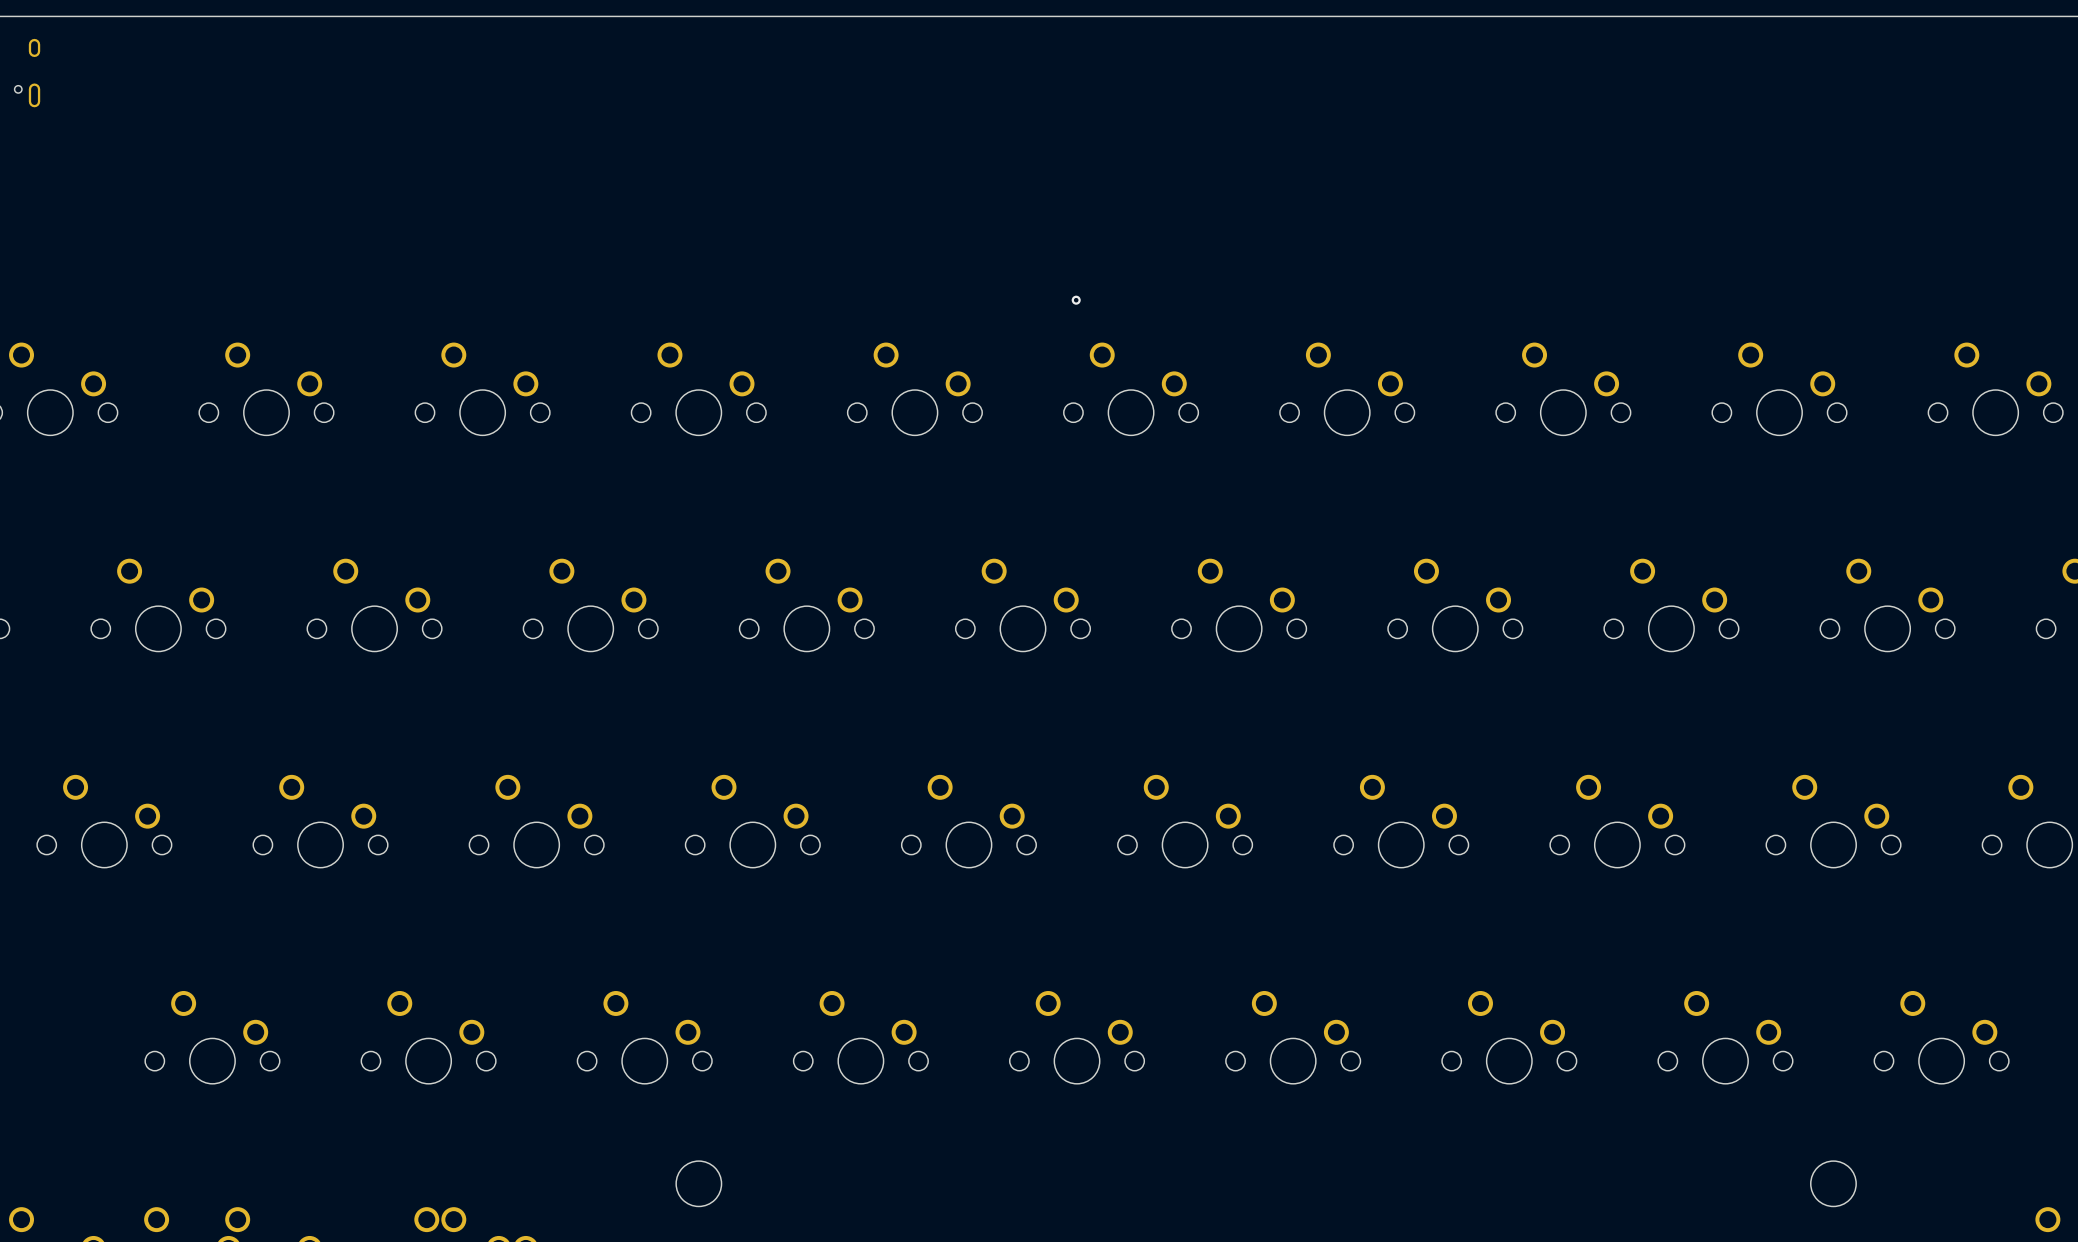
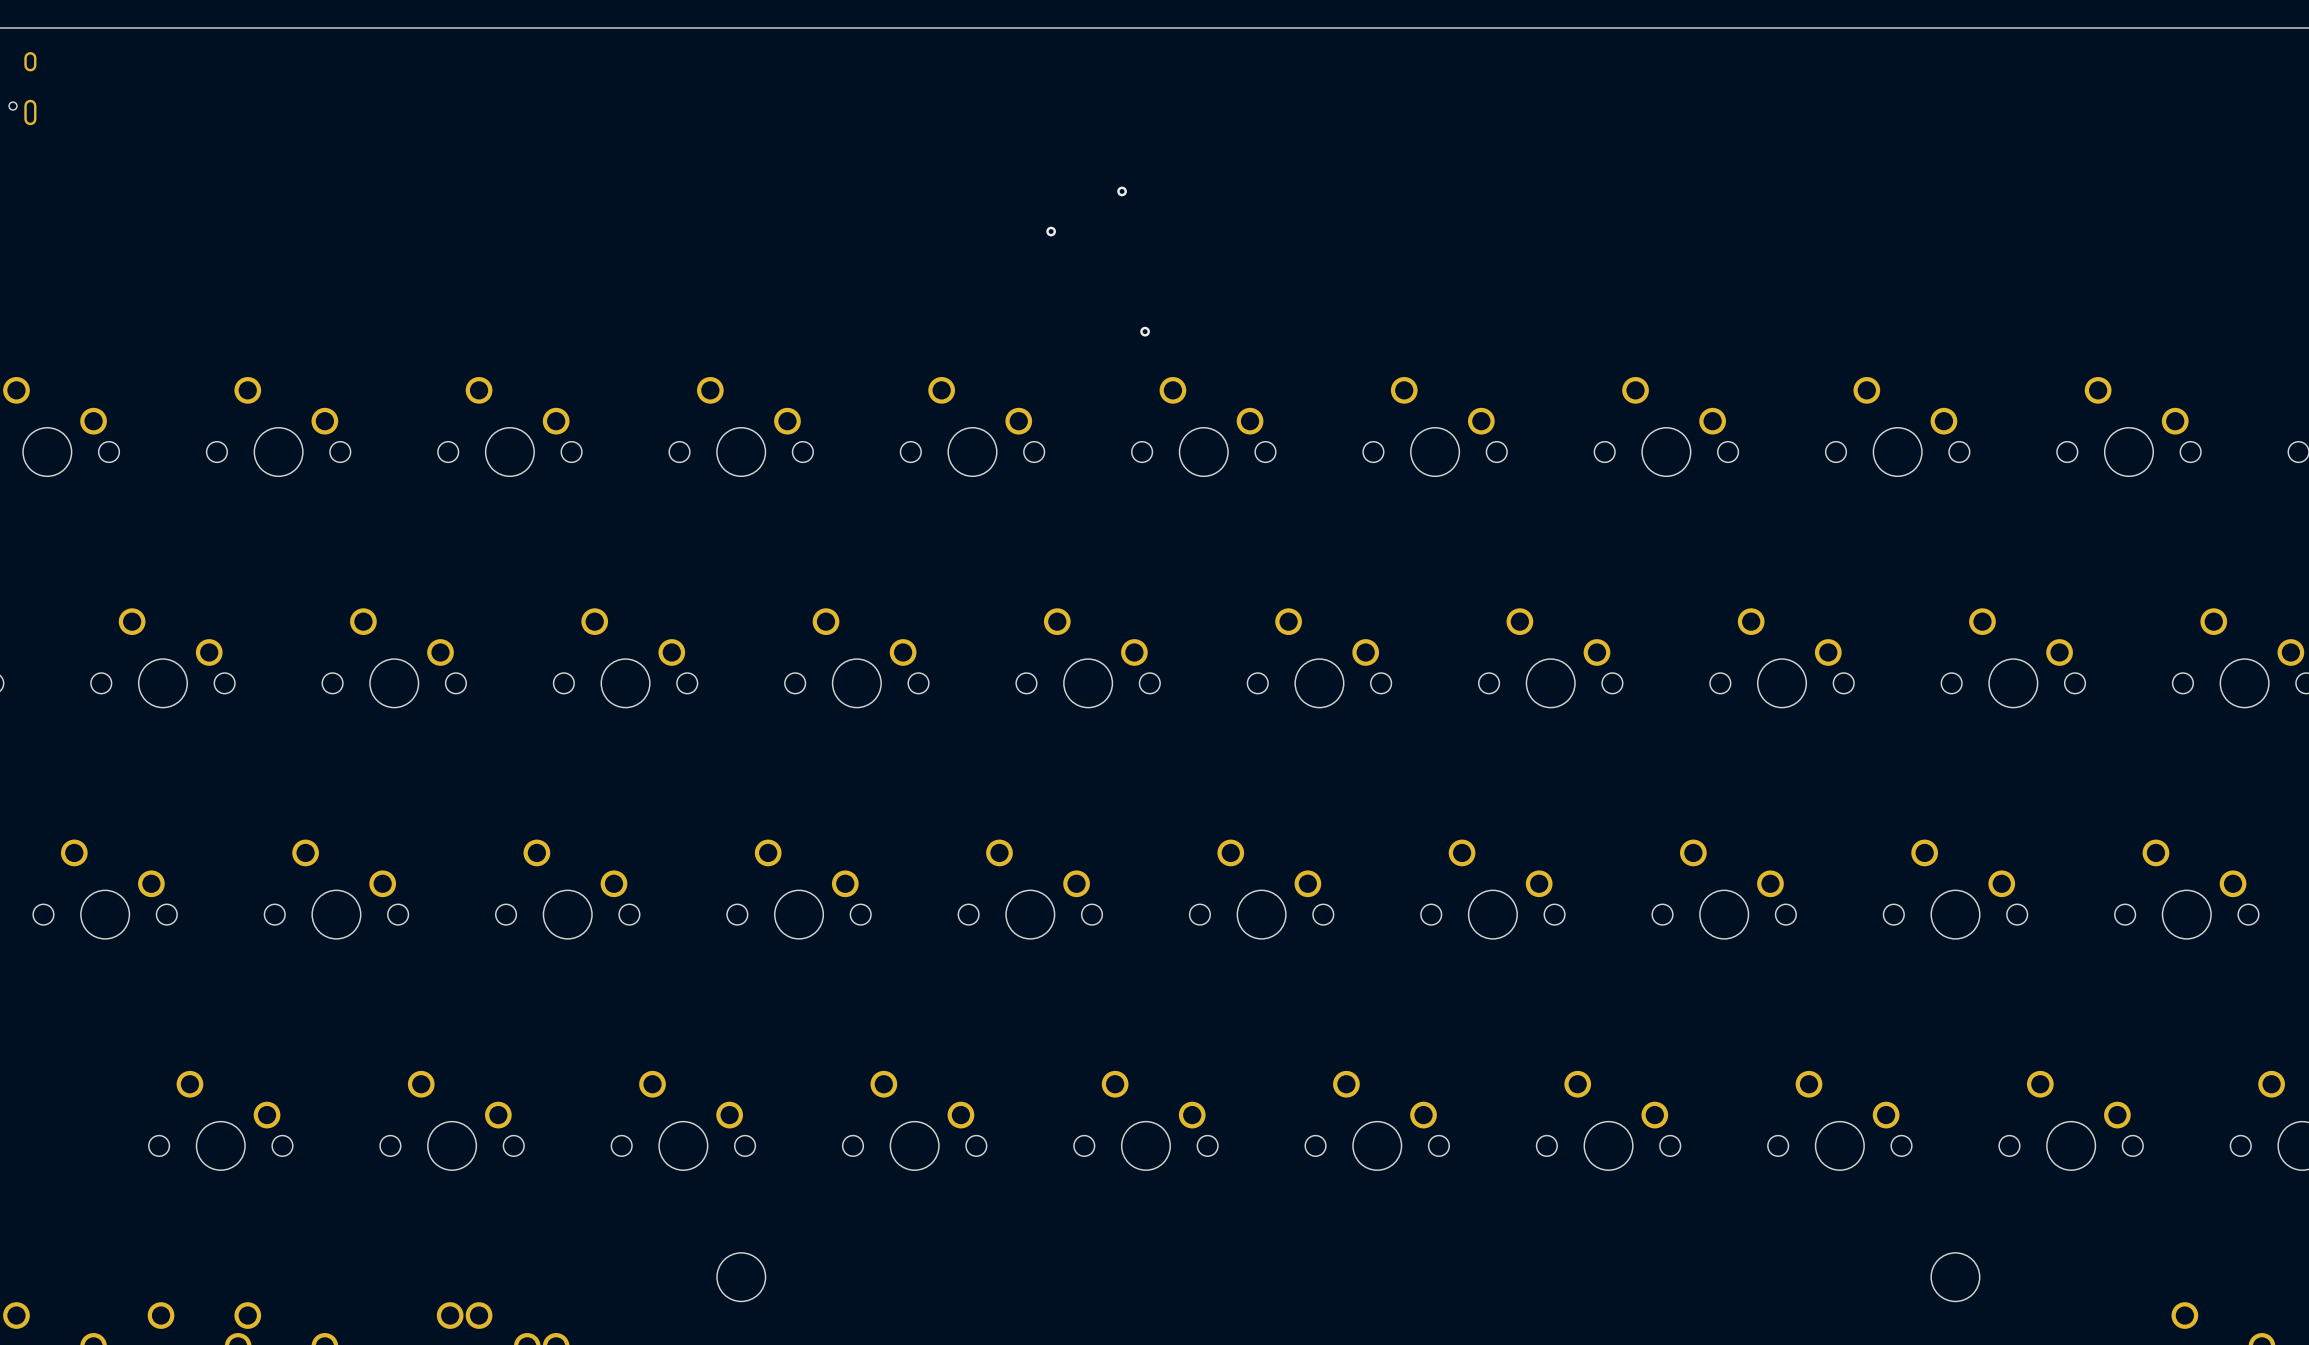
via: none -> (1122, 191)
via: none -> (1051, 231)

